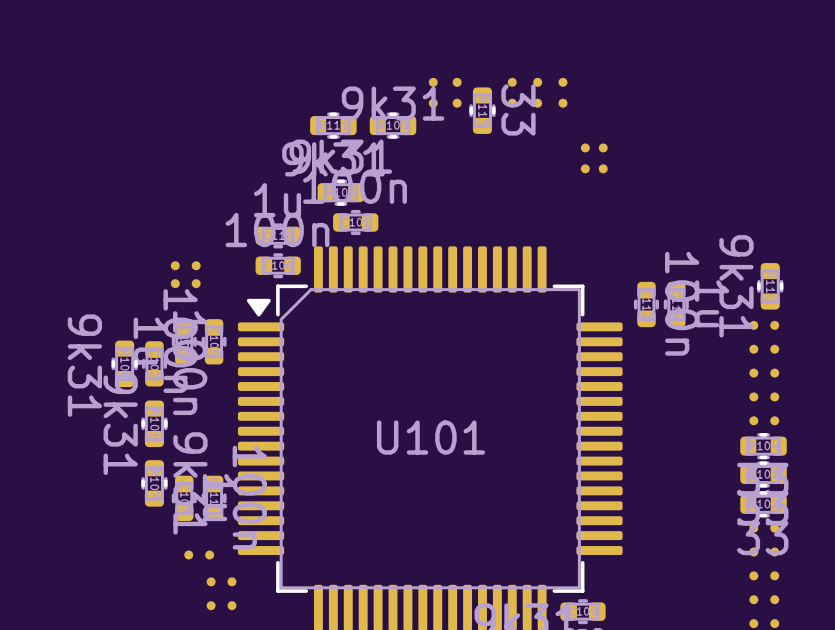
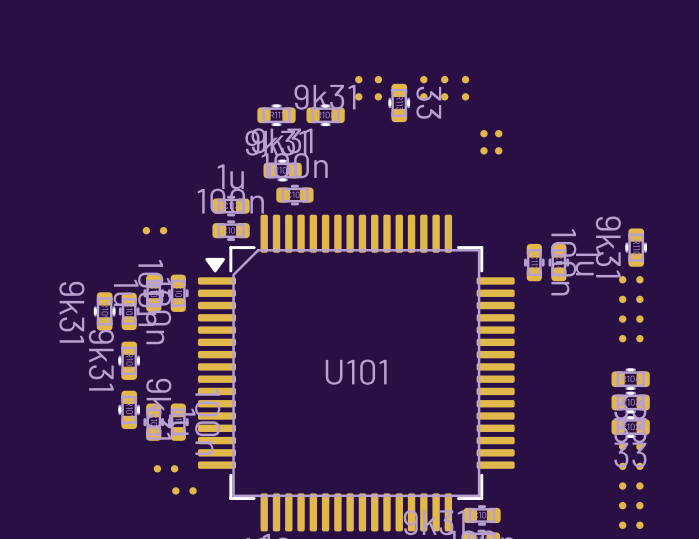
part: (185, 283) -> none
part: (764, 420) -> none
part: (221, 605) -> none

